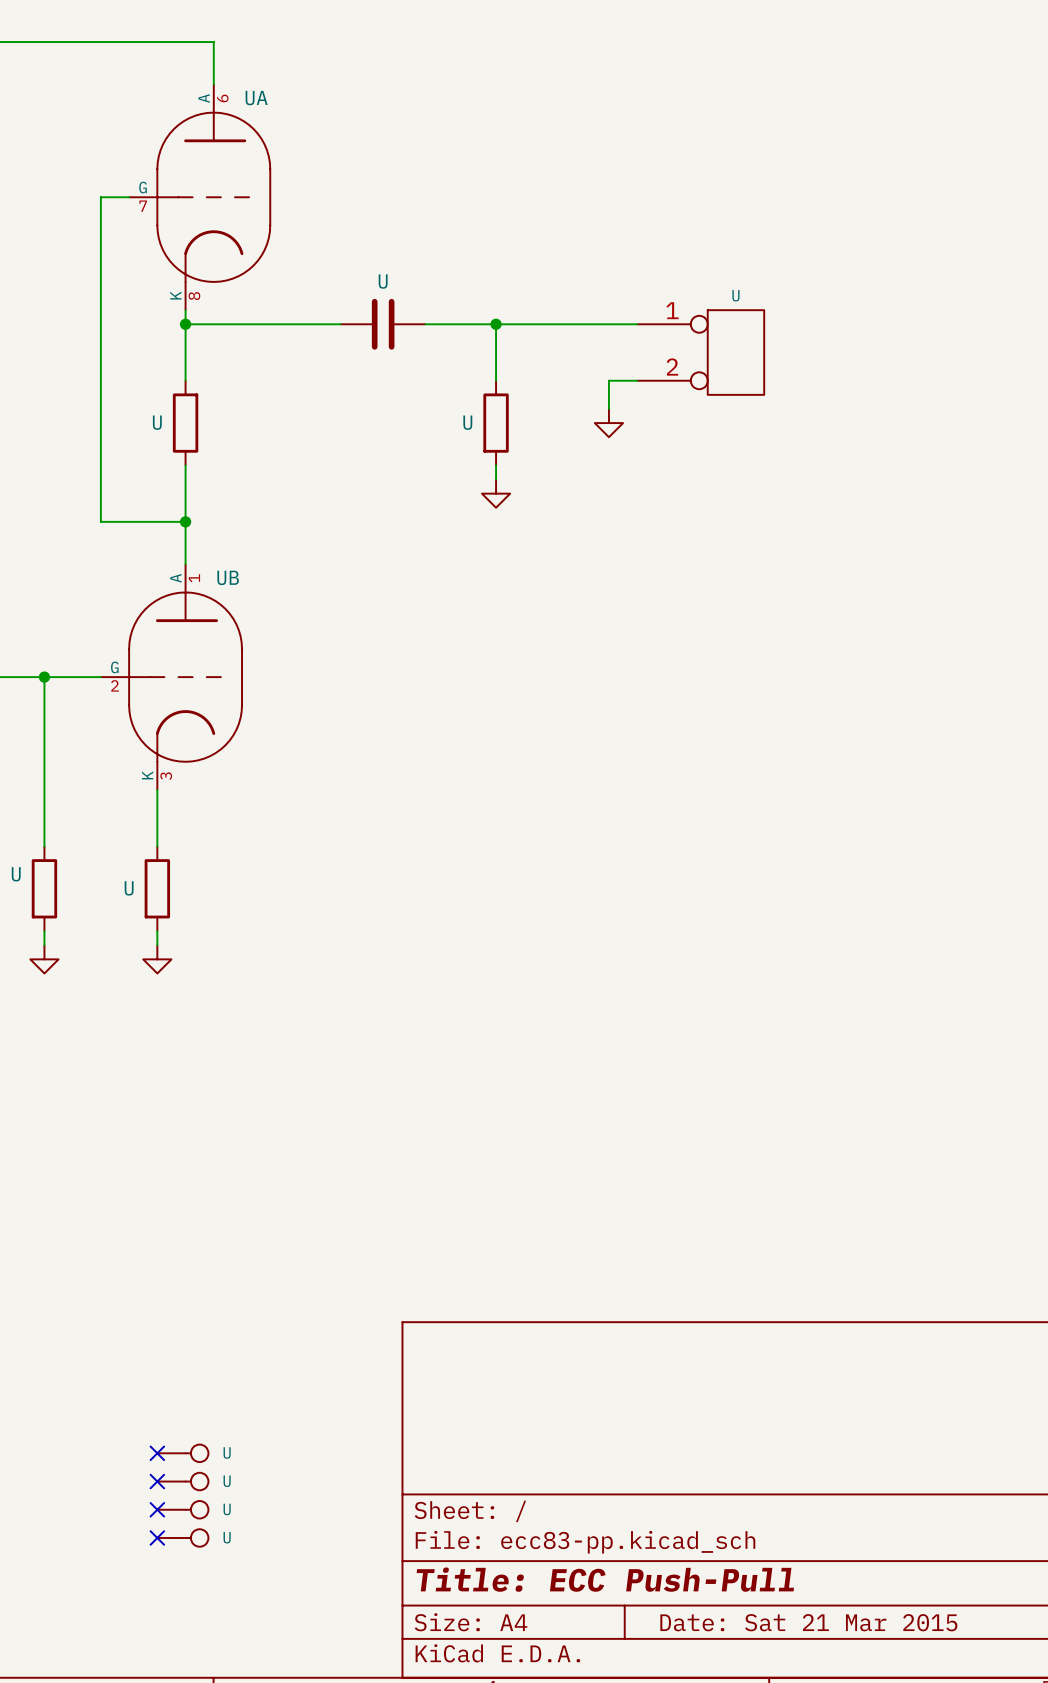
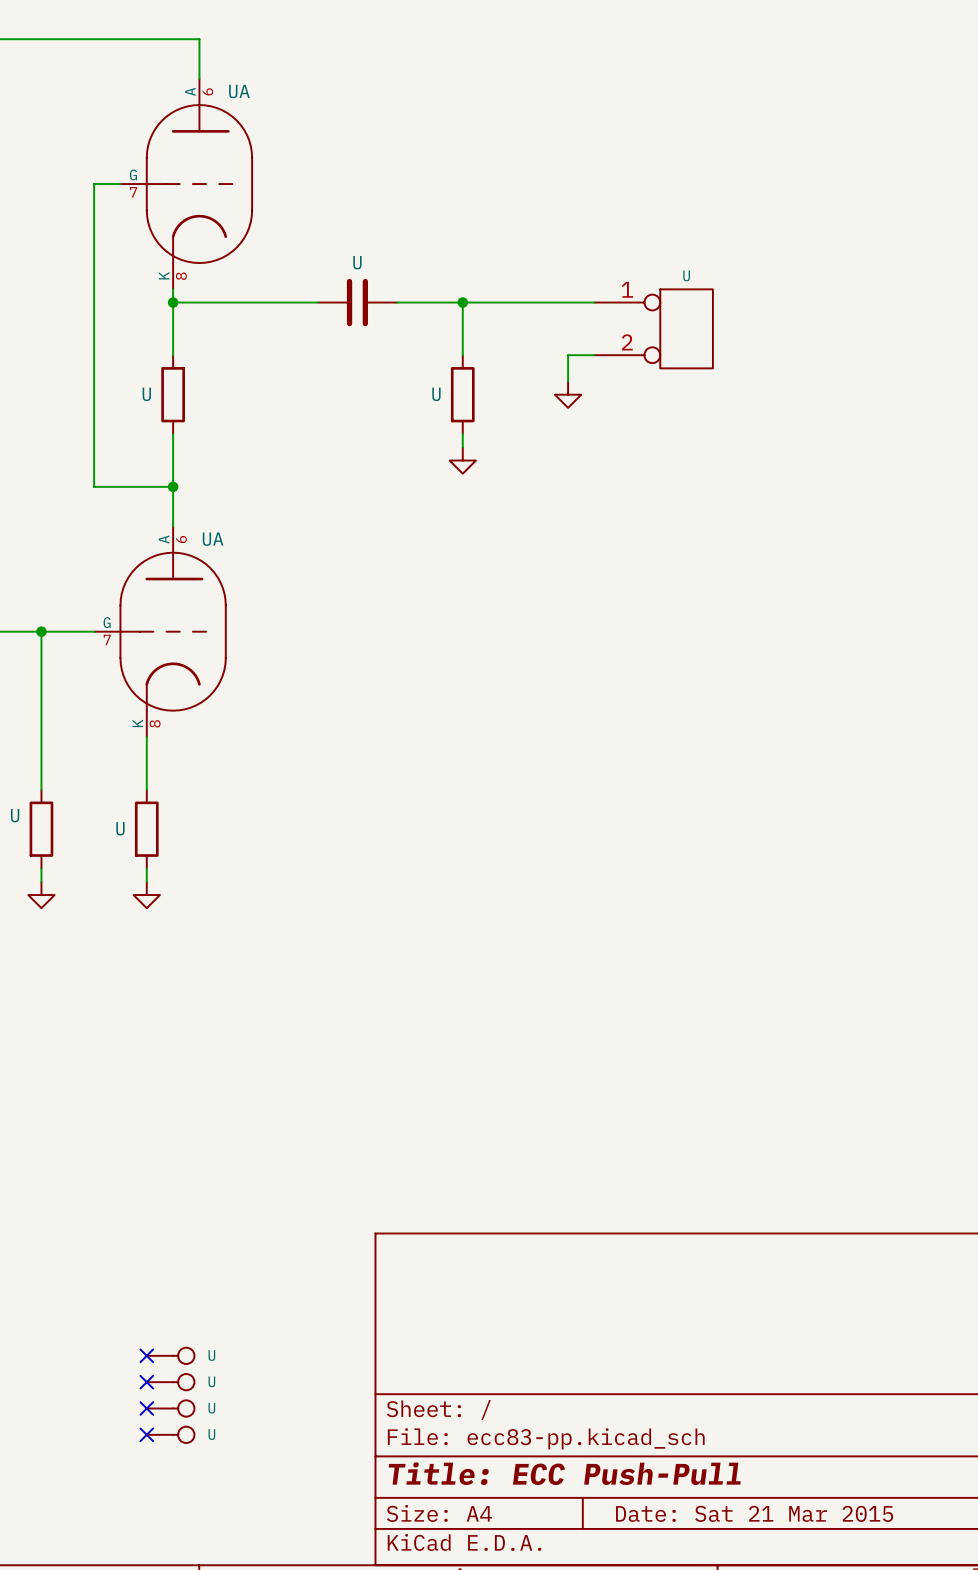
UB name: UB (228, 577) -> UA (213, 539)
UB pin number: 1 (194, 578) -> 6 (181, 539)
UB pin number: 2 (115, 685) -> 7 (107, 639)
UB pin number: 3 (166, 776) -> 8 (155, 723)

